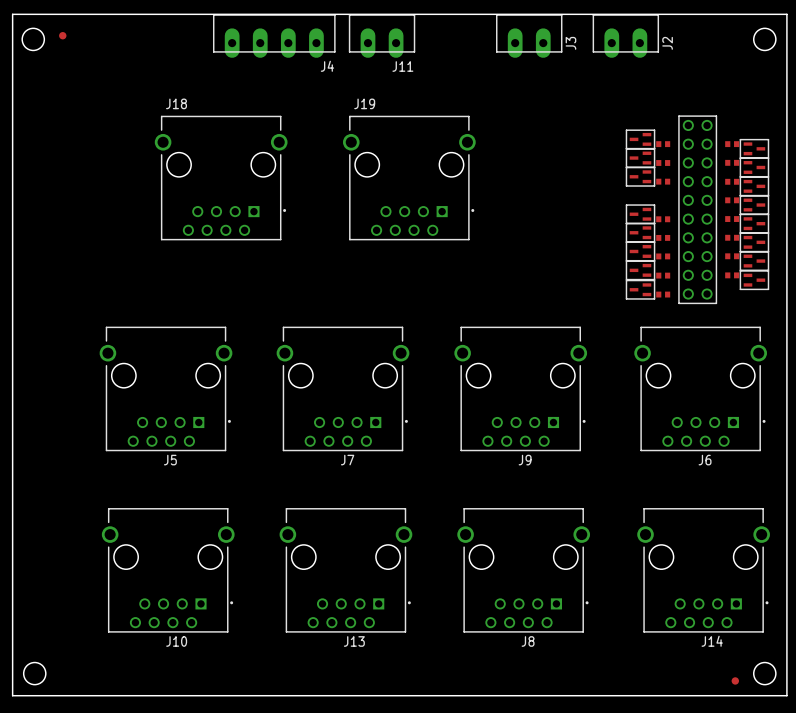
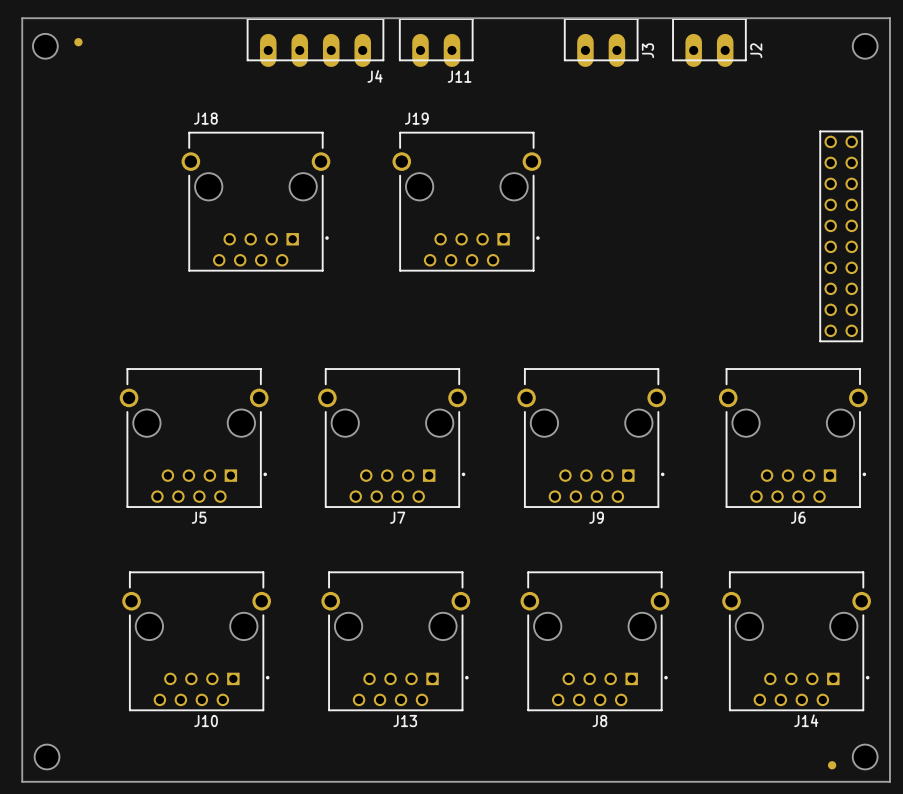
part: (640, 139) -> none
part: (663, 144) -> none
part: (732, 144) -> none
part: (754, 148) -> none
part: (640, 158) -> none
part: (663, 162) -> none
part: (732, 162) -> none
part: (754, 167) -> none
part: (640, 176) -> none
part: (663, 181) -> none
part: (732, 181) -> none
part: (754, 186) -> none
part: (732, 200) -> none
part: (754, 205) -> none
part position: (697, 209) -> (841, 236)
part: (640, 214) -> none
part: (663, 219) -> none
part: (732, 219) -> none
part: (754, 223) -> none
part: (640, 232) -> none
part: (663, 237) -> none
part: (732, 237) -> none
part: (754, 242) -> none
part: (640, 251) -> none
part: (663, 256) -> none
part: (732, 256) -> none
part: (754, 261) -> none
part: (640, 270) -> none
part: (663, 275) -> none
part: (732, 275) -> none
part: (754, 280) -> none
part: (640, 289) -> none
part: (663, 294) -> none

